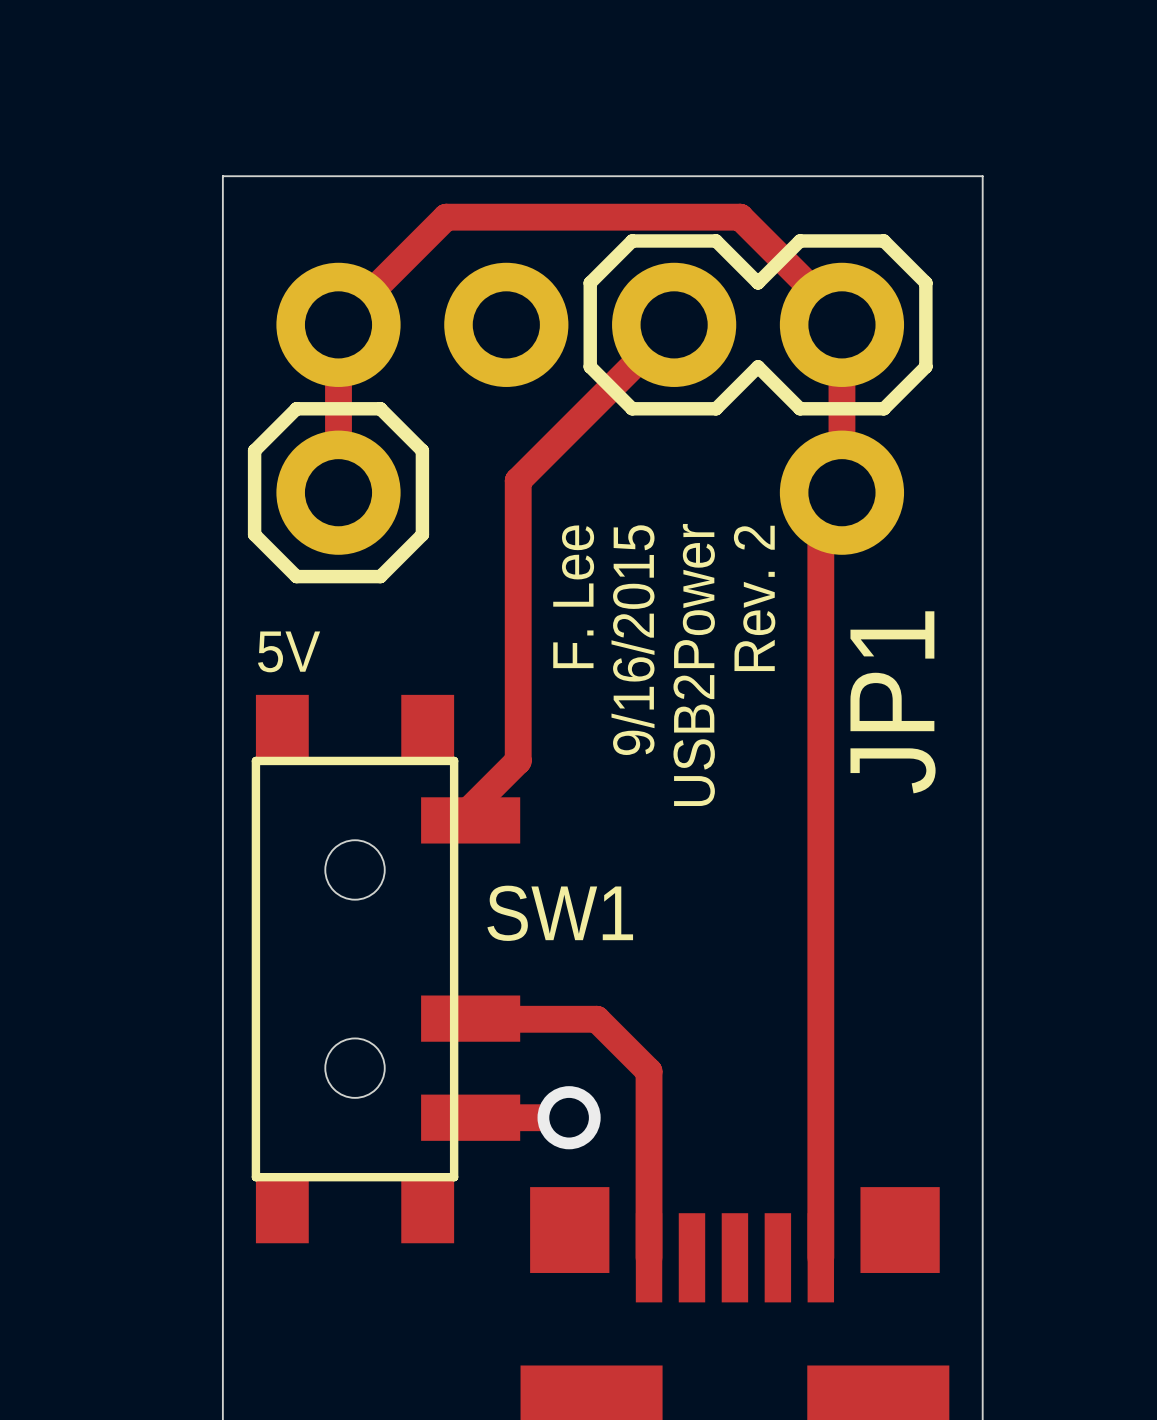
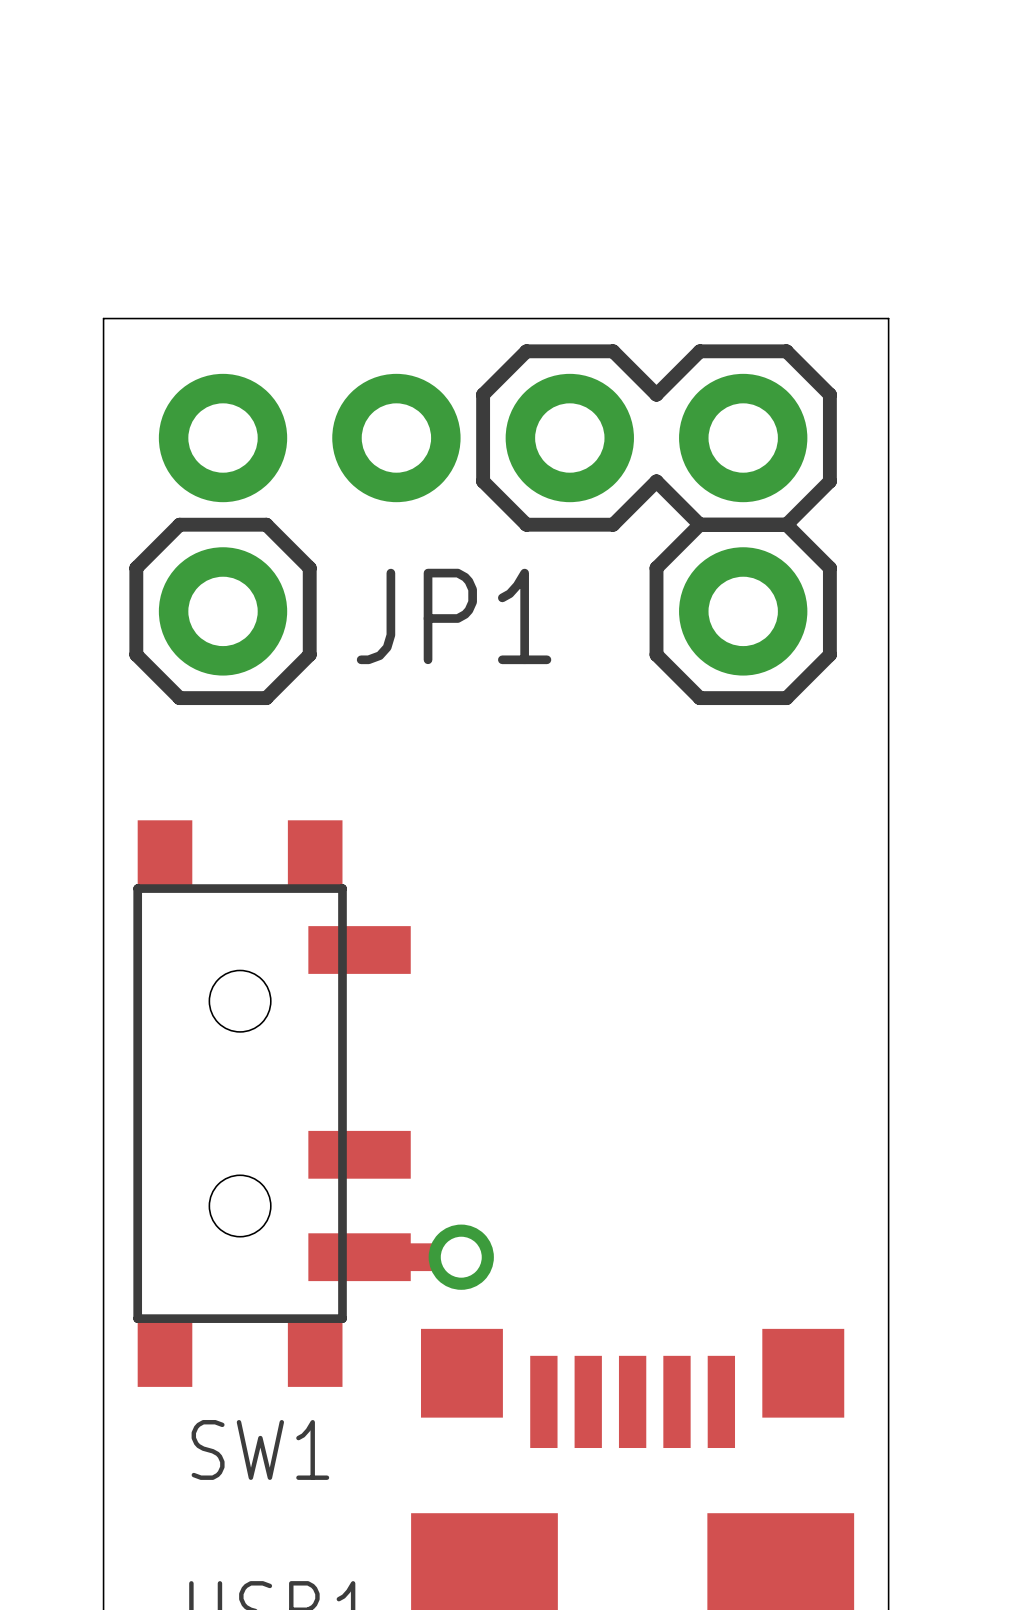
board edge: (222, 209) (222, 176) (982, 176) (982, 209) -> (103, 318) (888, 318)
track: (841, 318) (740, 217) (446, 217) (338, 324) (338, 492) -> none
track: (674, 324) (518, 480) (518, 760) (470, 808) (470, 820) -> none
track: (841, 324) (841, 492) (820, 513) (820, 1257) -> none
part side: bottom (841, 492) -> top (743, 611)
text: F. Lee (573, 596) -> none
text: Rev. 2 (754, 598) -> none
text: 9/16/2015 (633, 640) -> none
text: 5V (289, 651) -> none
text: USB2Power (694, 664) -> none
JP1 name rotation: 0° (893, 702) -> 90° clockwise (454, 616)
JP1 name position: JP1 (893, 702) -> JP1 (454, 616)
SW1 name position: SW1 (560, 913) -> SW1 (260, 1449)
track: (471, 1019) (596, 1019) (649, 1071) (649, 1257) -> none

